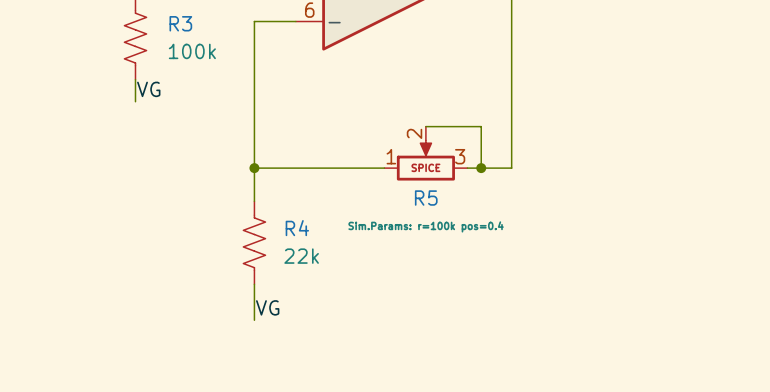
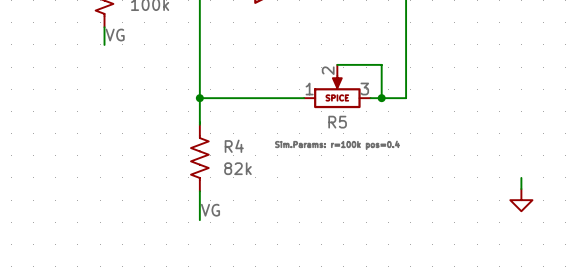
R4 value: 22k (301, 256) -> 82k (237, 168)
wire: none -> (521, 177) (521, 189)
power symbol: none -> (521, 200)

